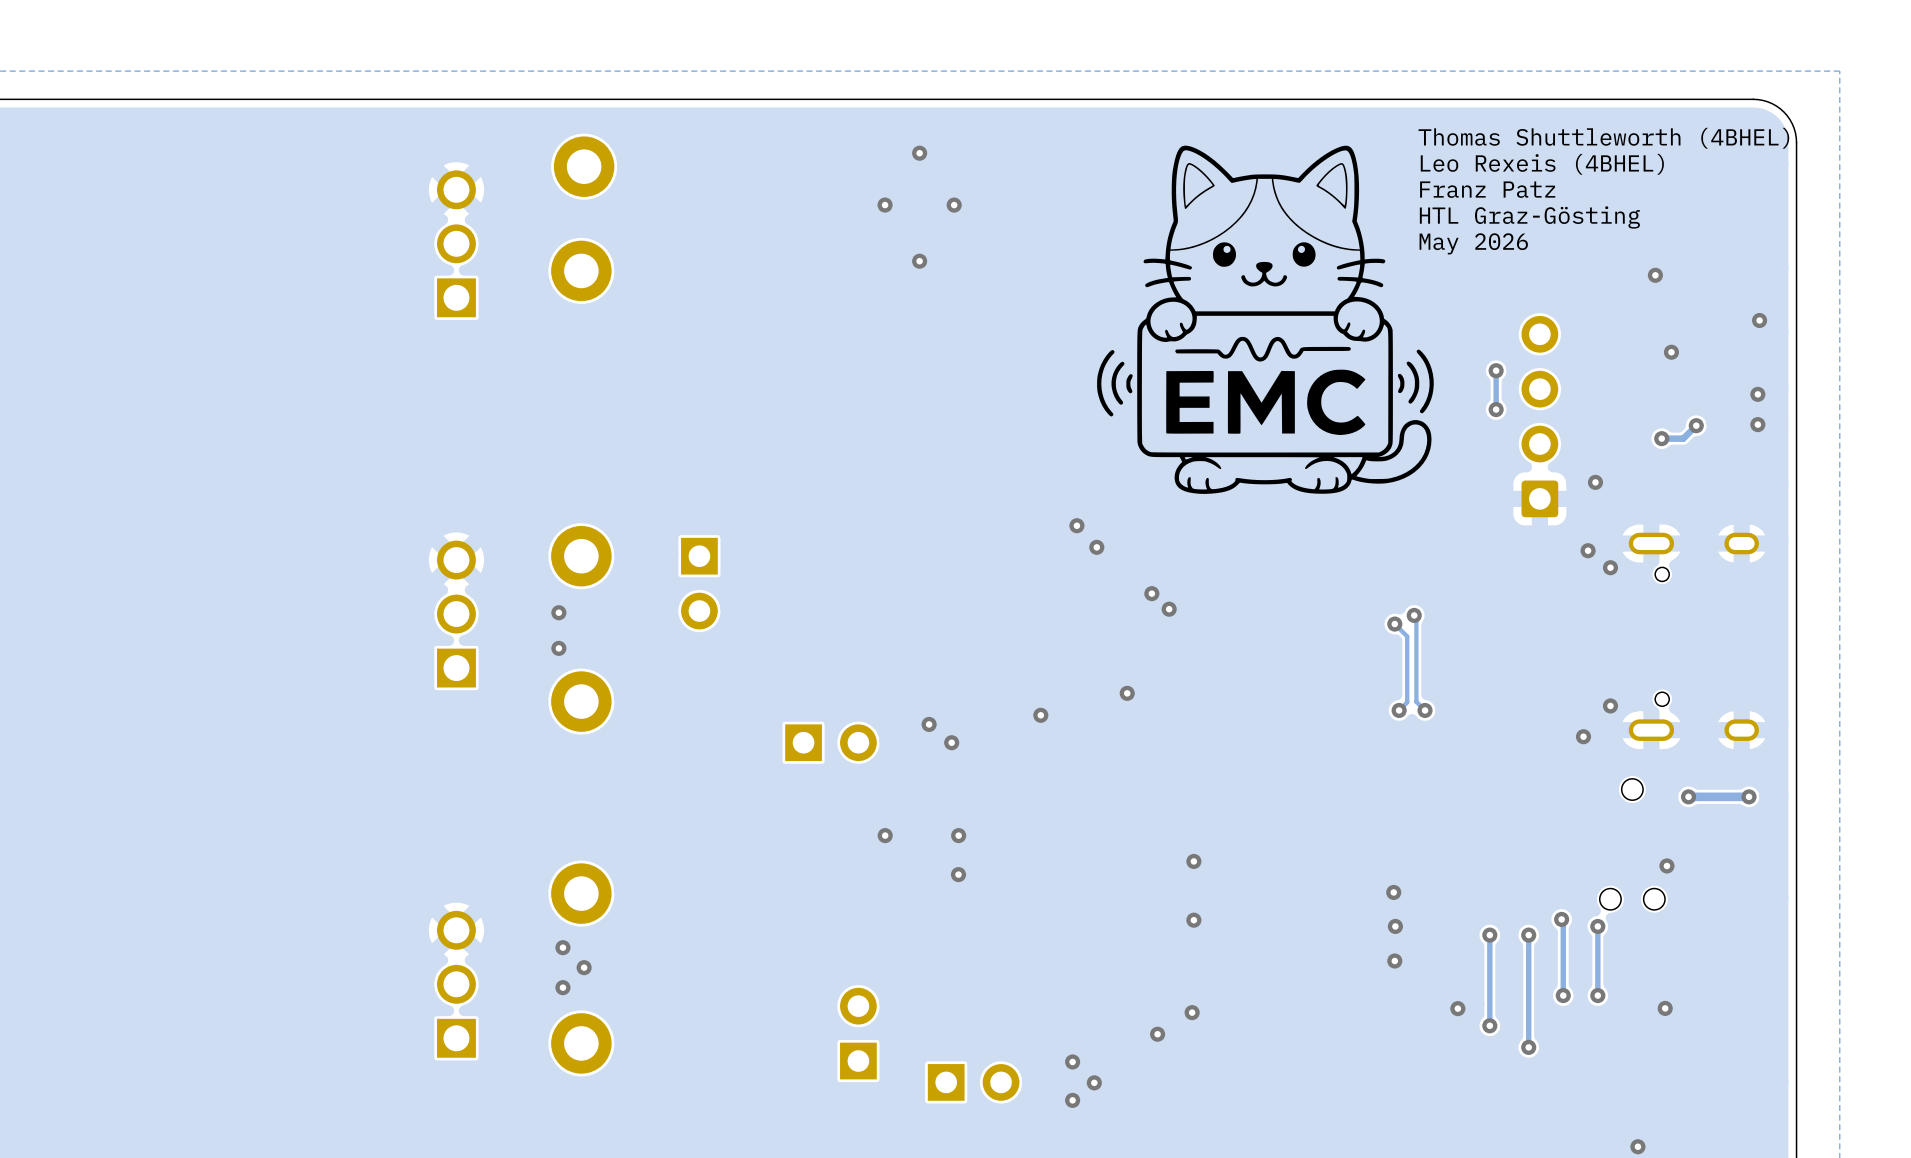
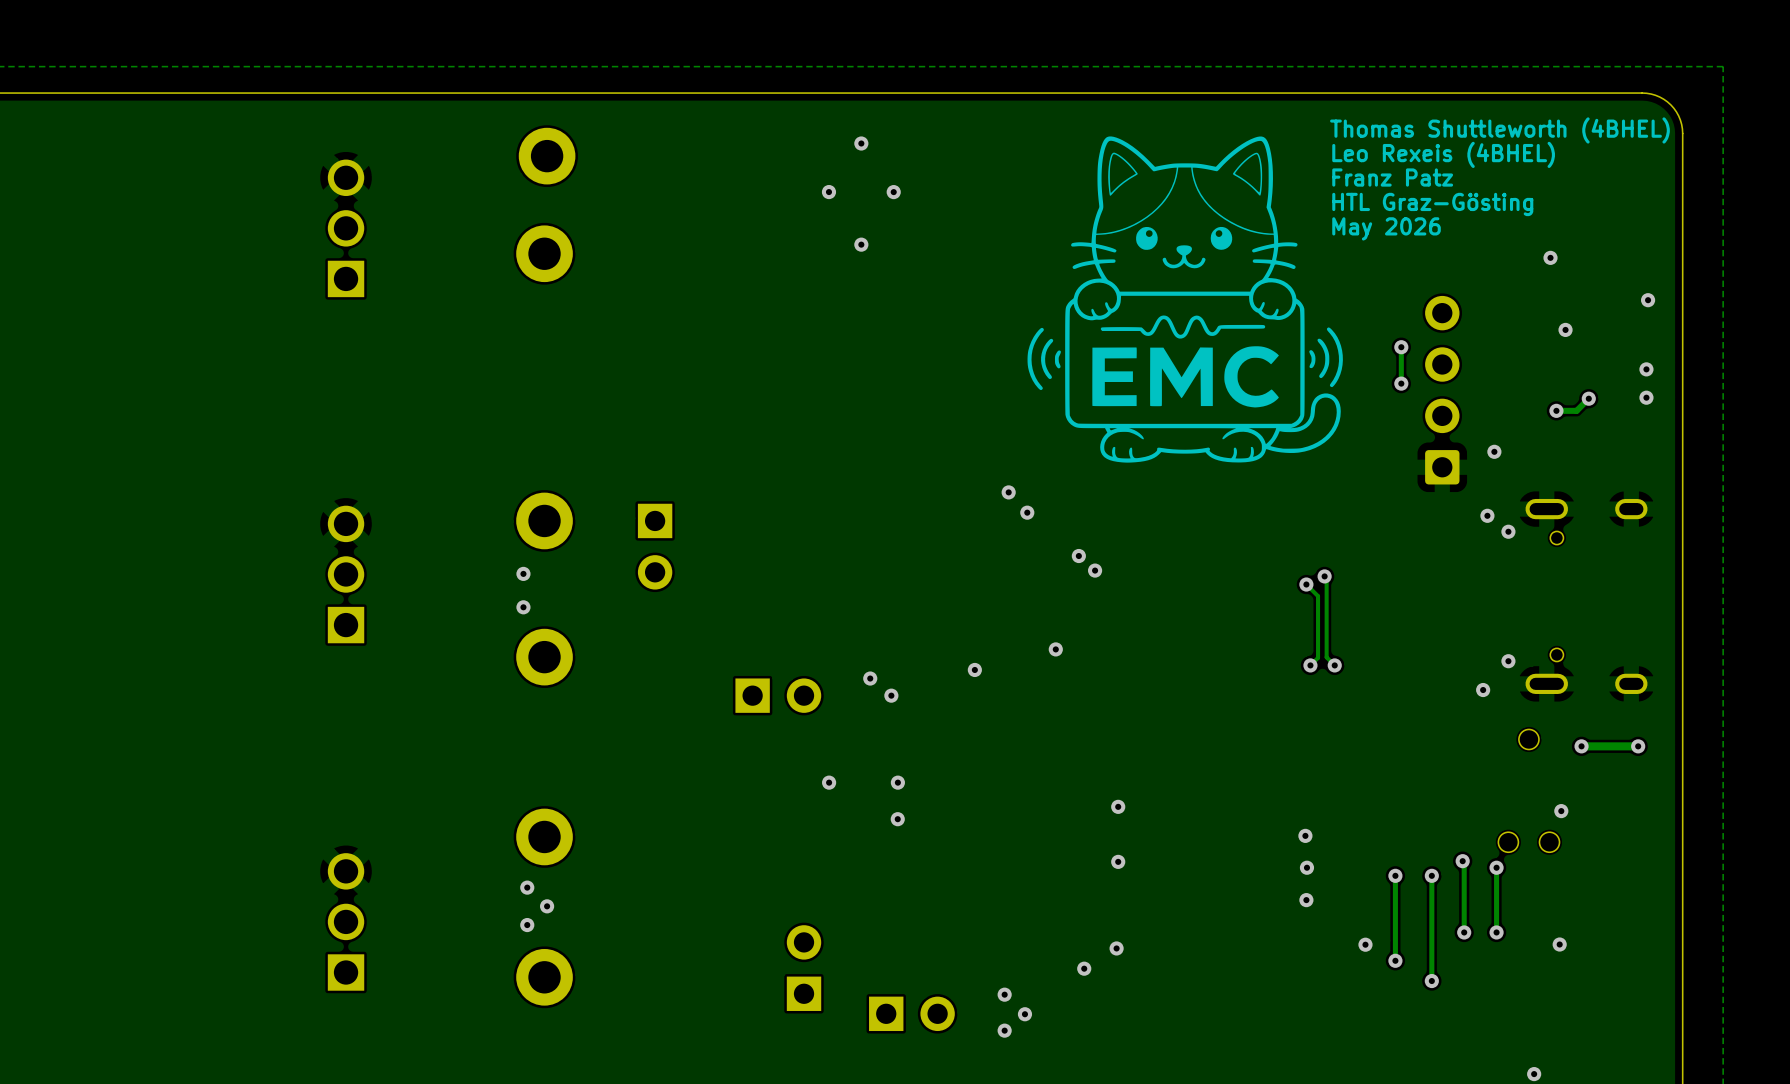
part position: (456, 243) -> (346, 228)
part position: (456, 614) -> (346, 574)
part position: (456, 984) -> (346, 921)

